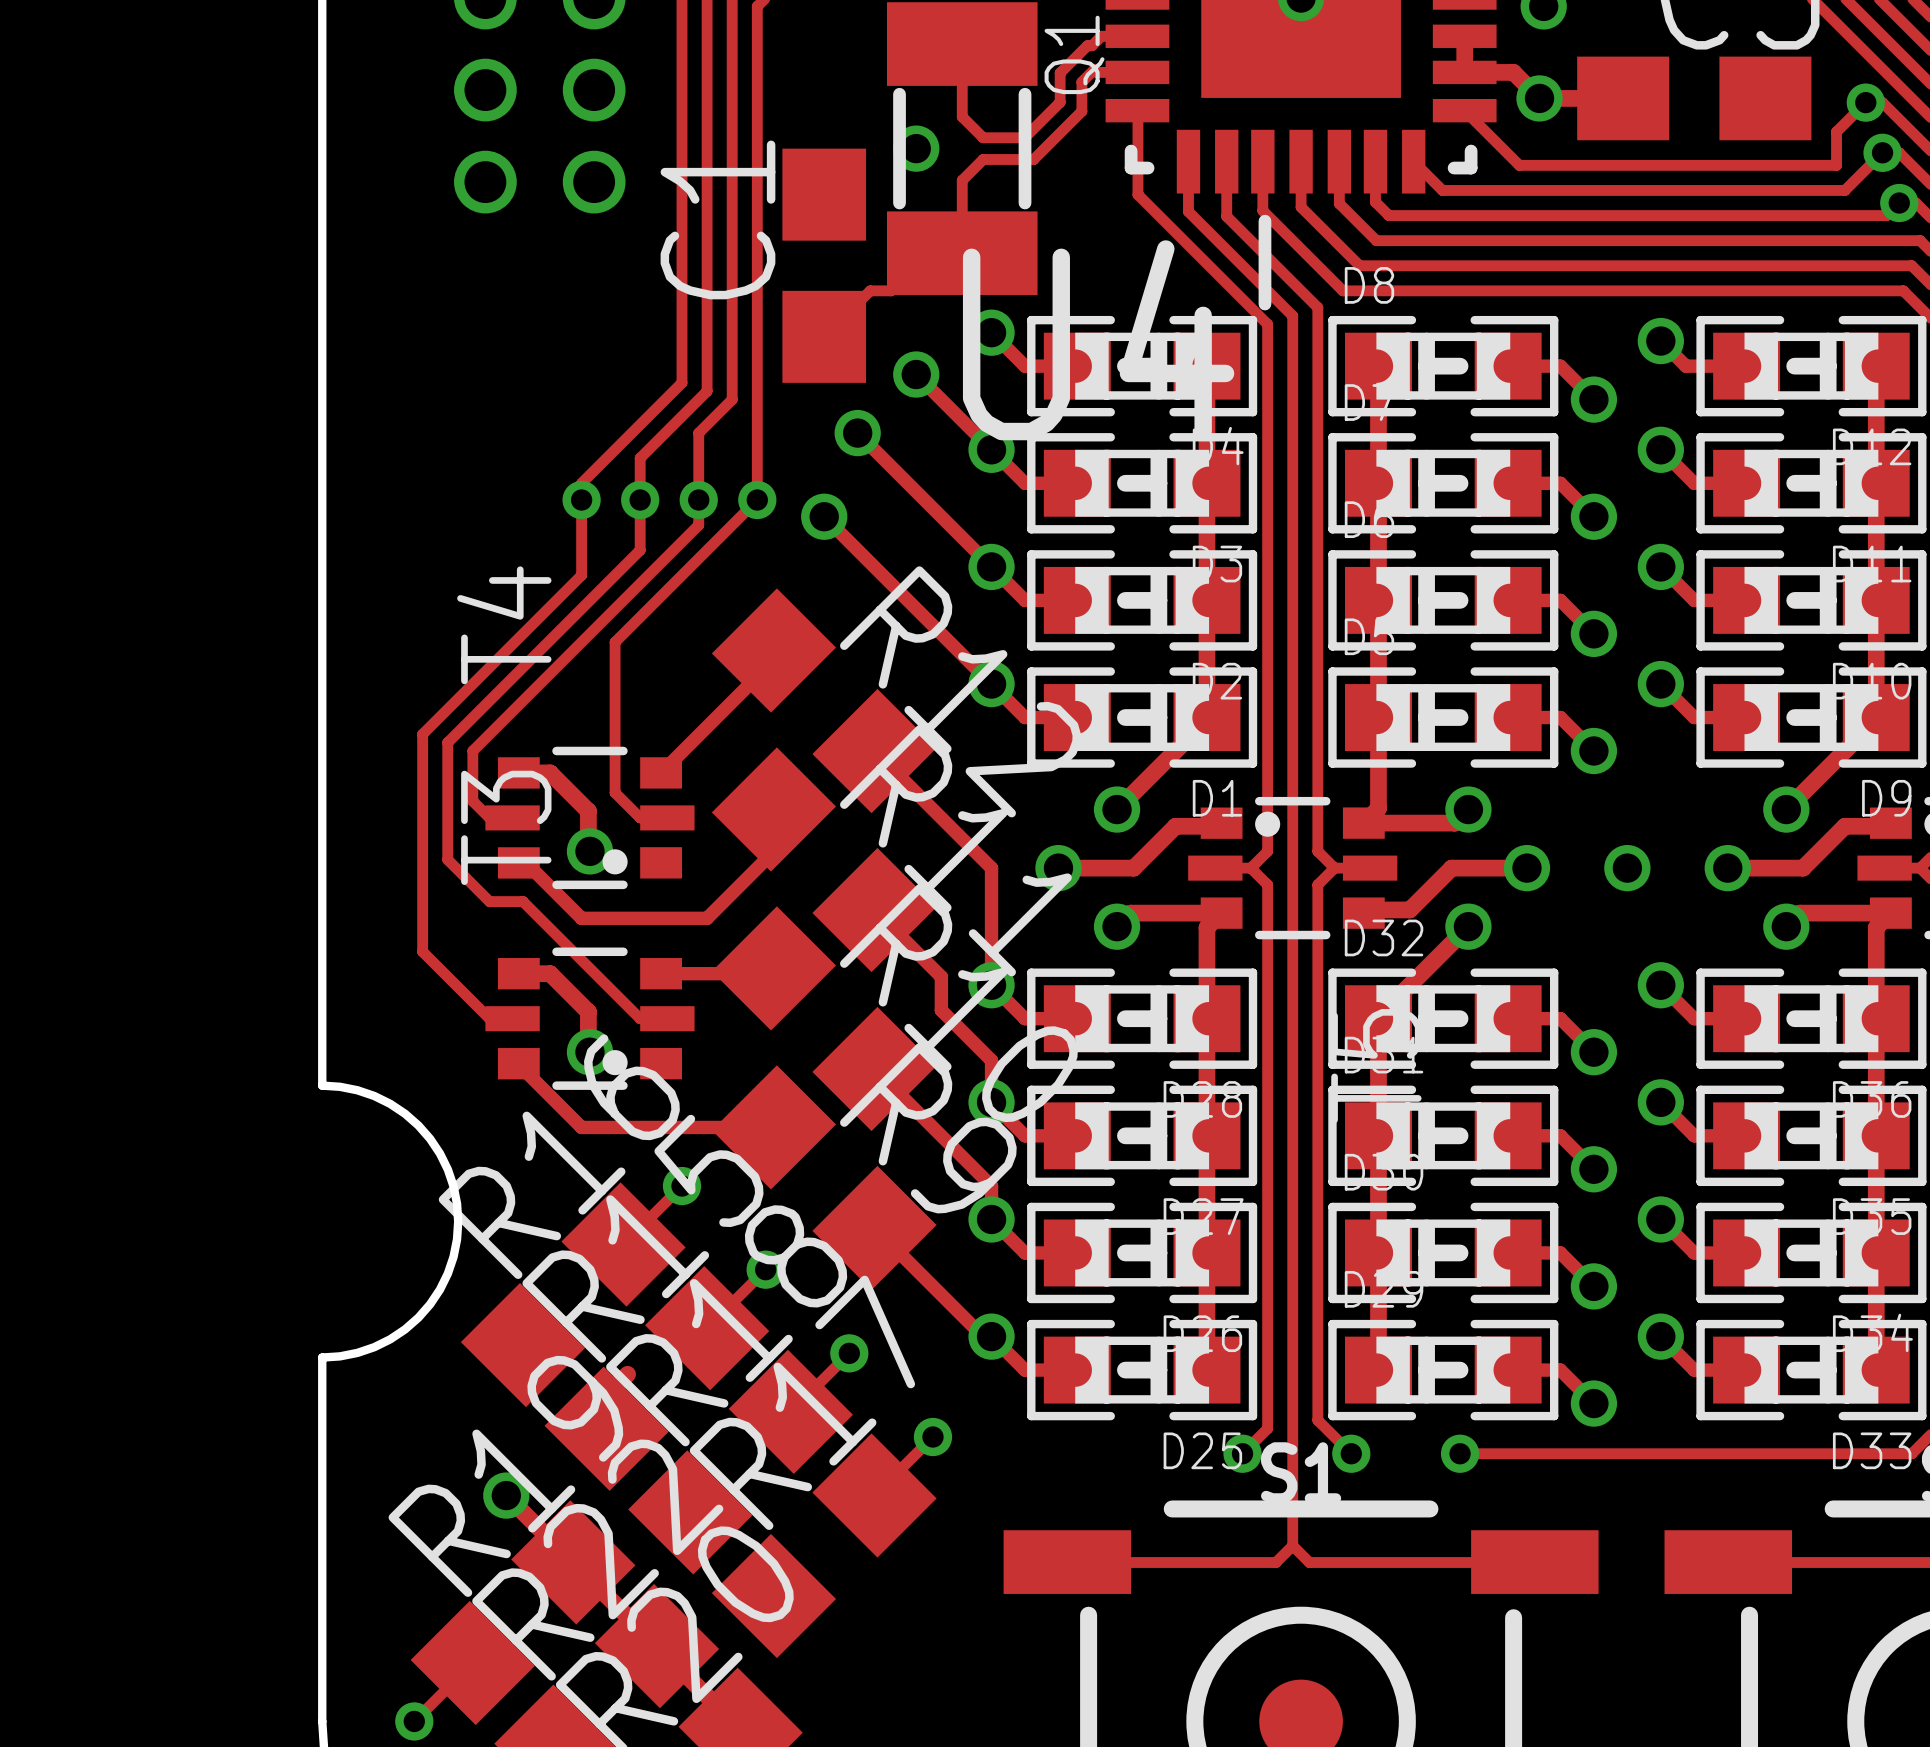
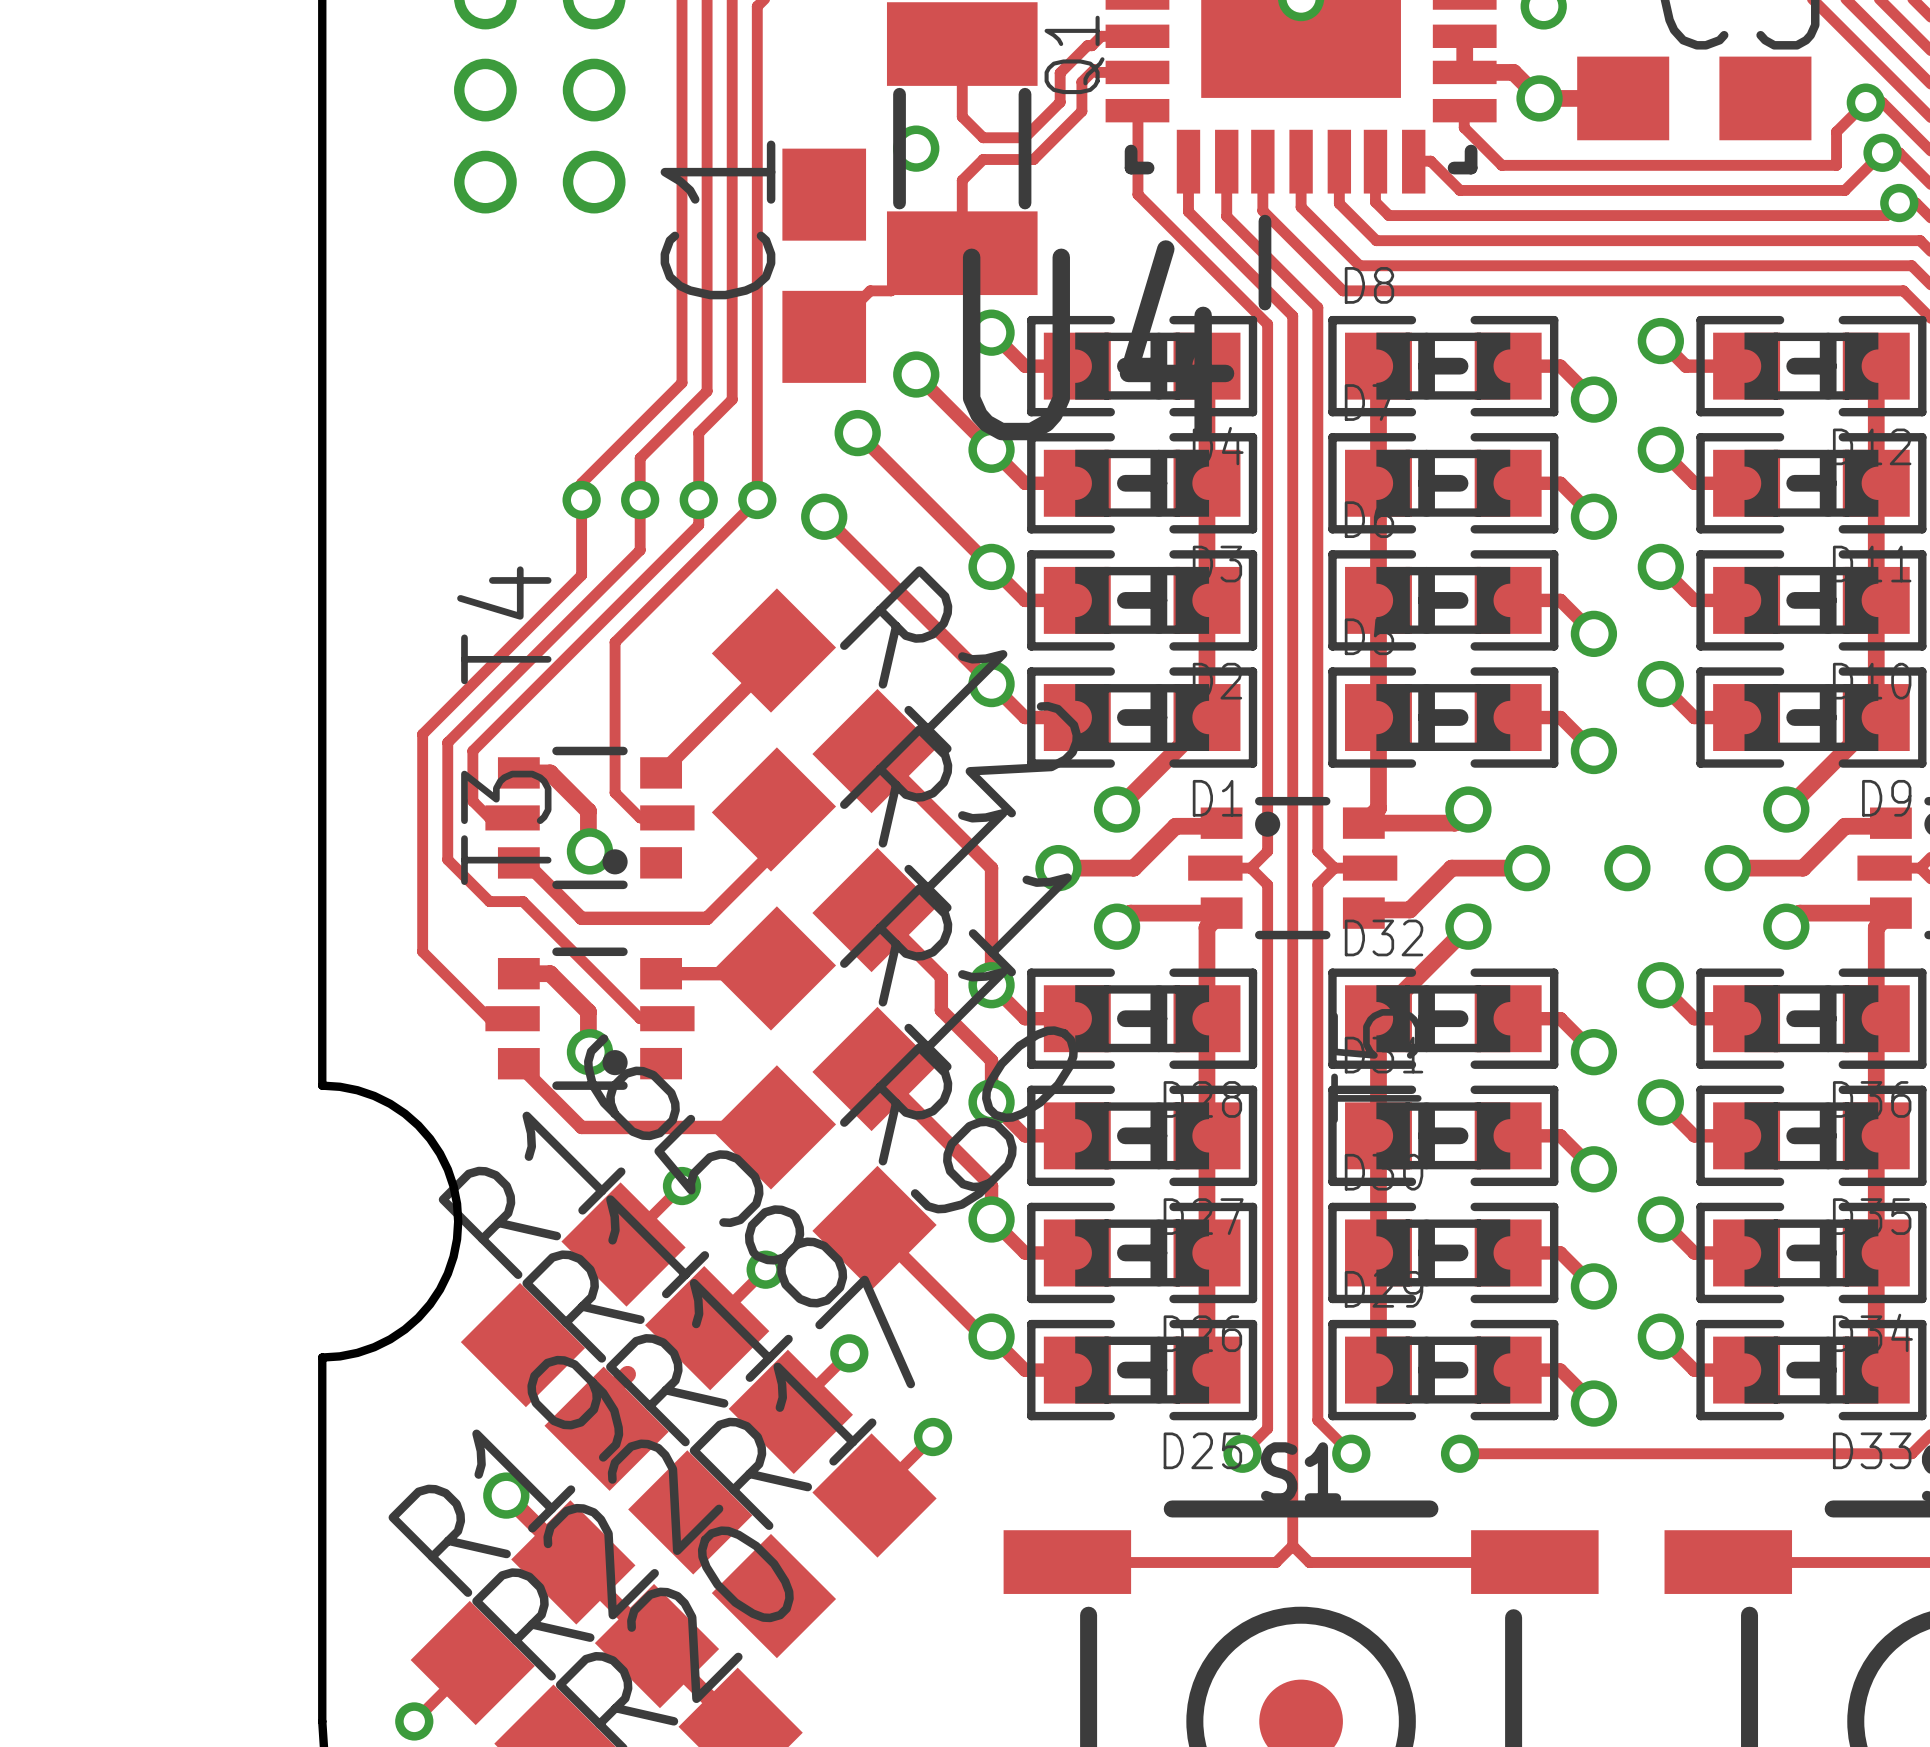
track: (1464, 110) (1519, 165) -> (1464, 110) (1464, 127) (1501, 165) (1519, 165)
track: (1413, 161) (1442, 190) (1460, 190) -> (1413, 161) (1430, 161) (1460, 190)

